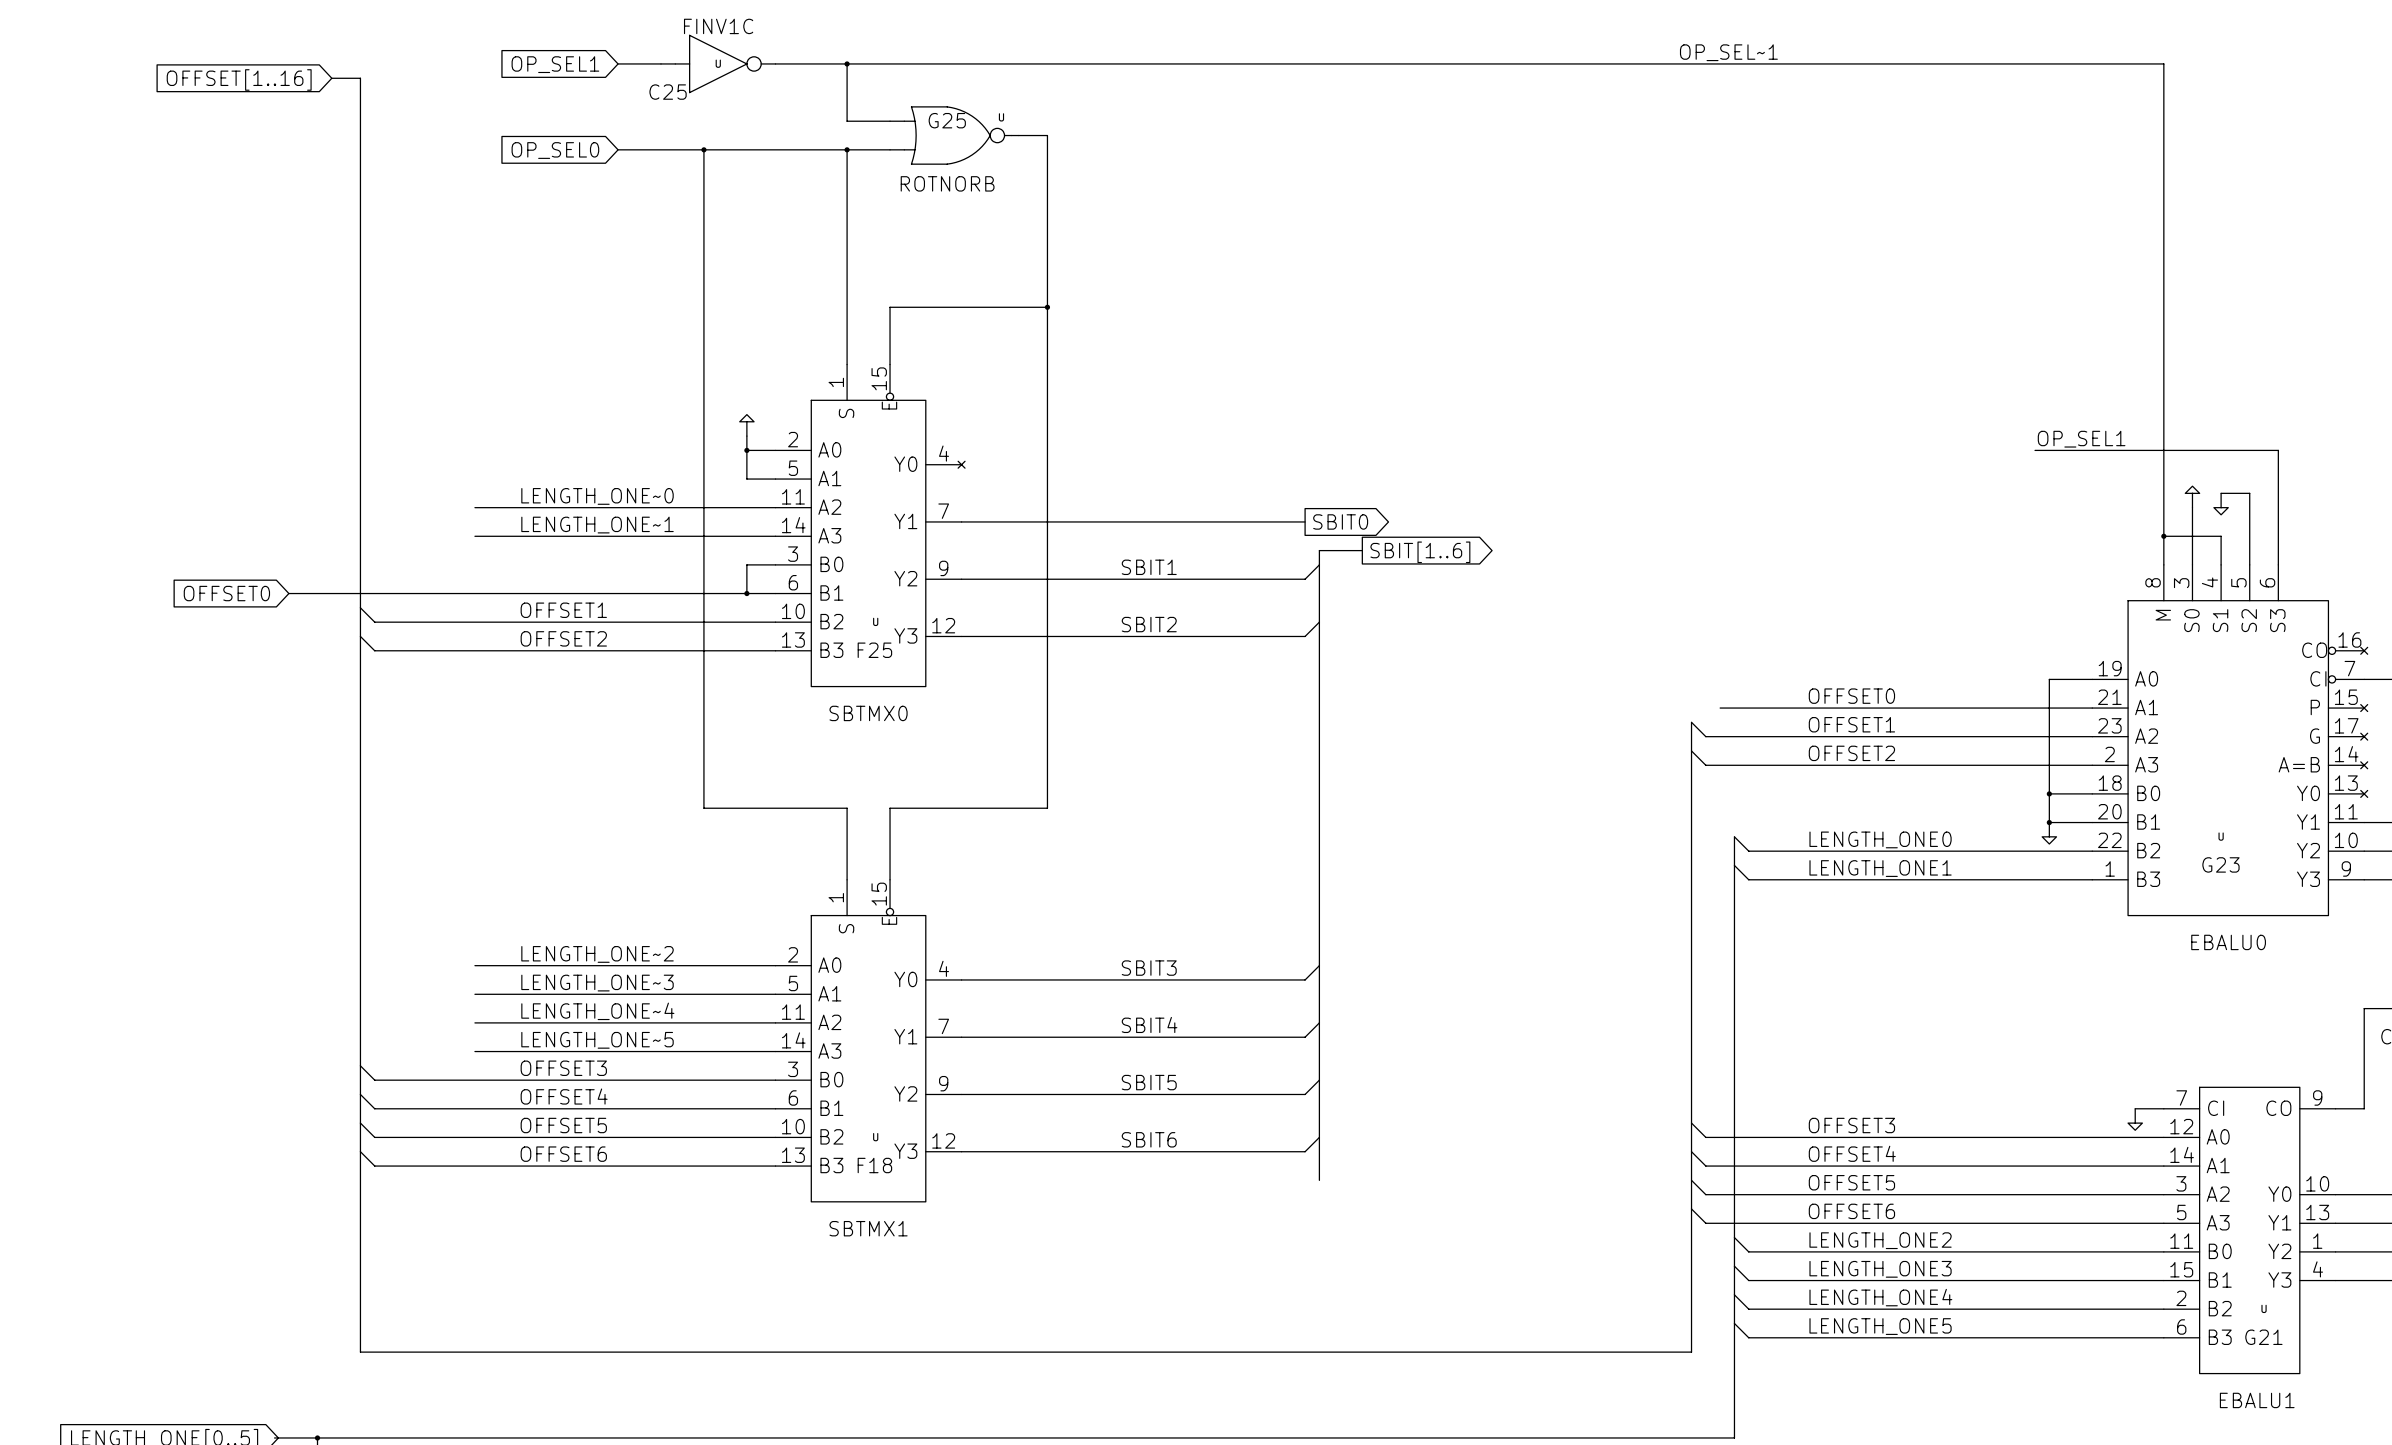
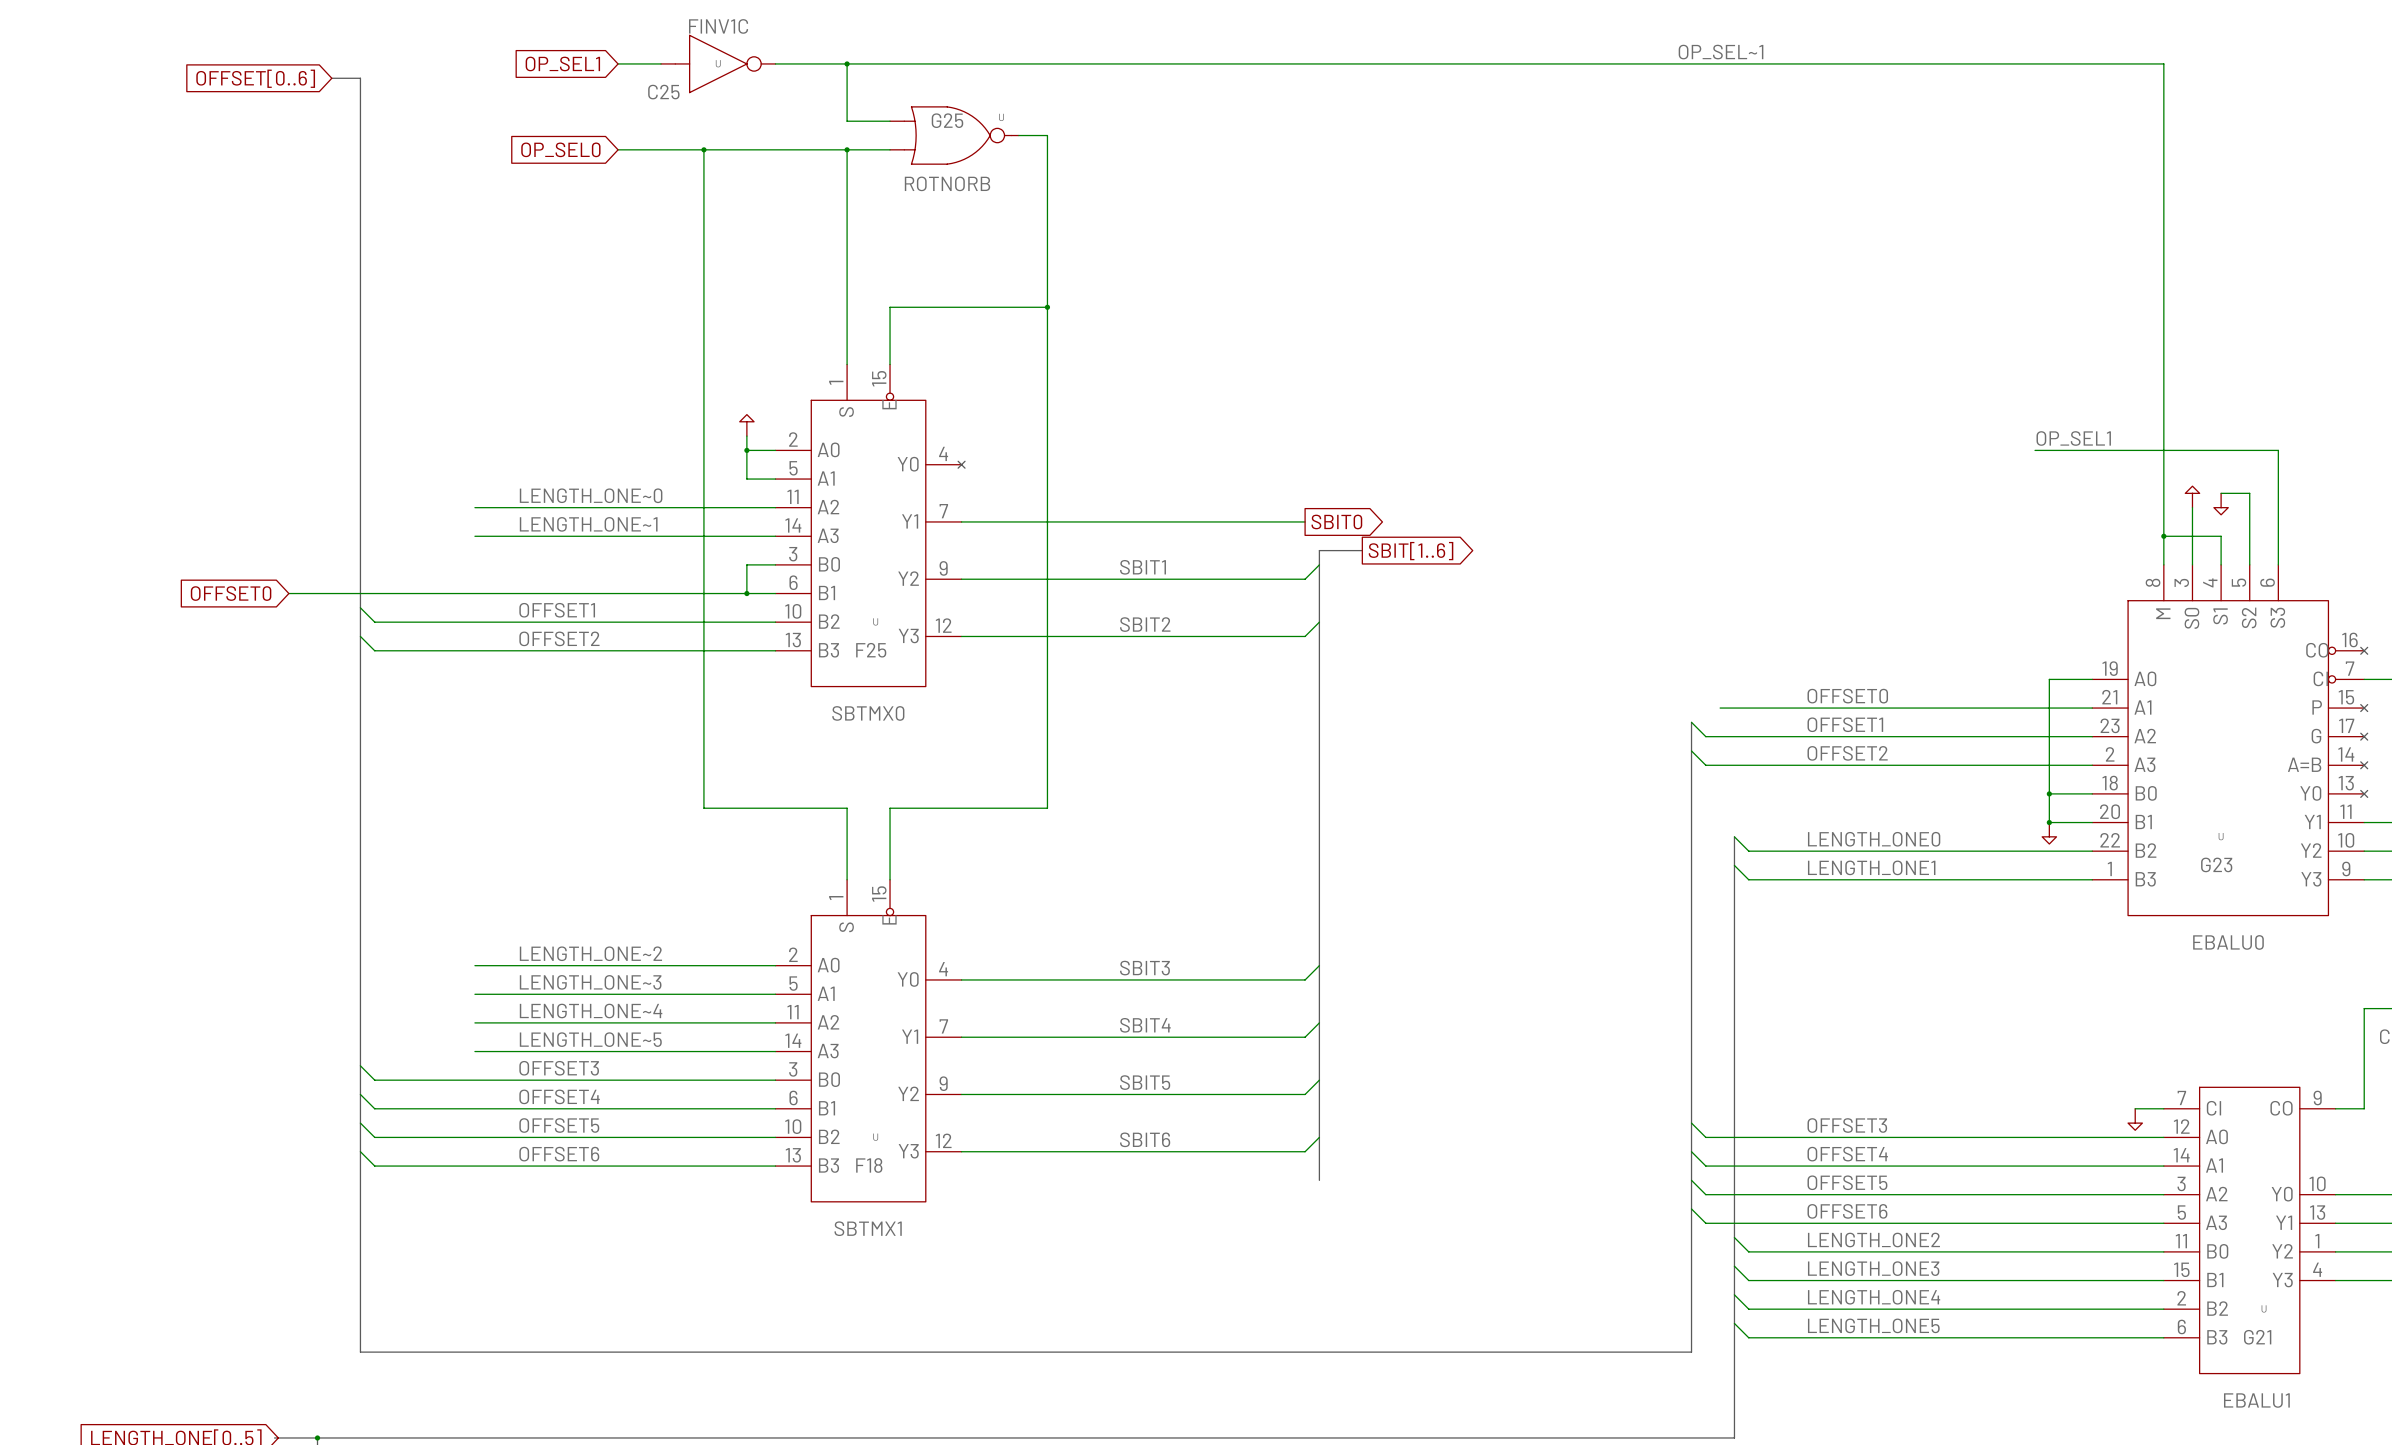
global label: OFFSET[1..16] (239, 79) -> OFFSET[0..6] (255, 78)

